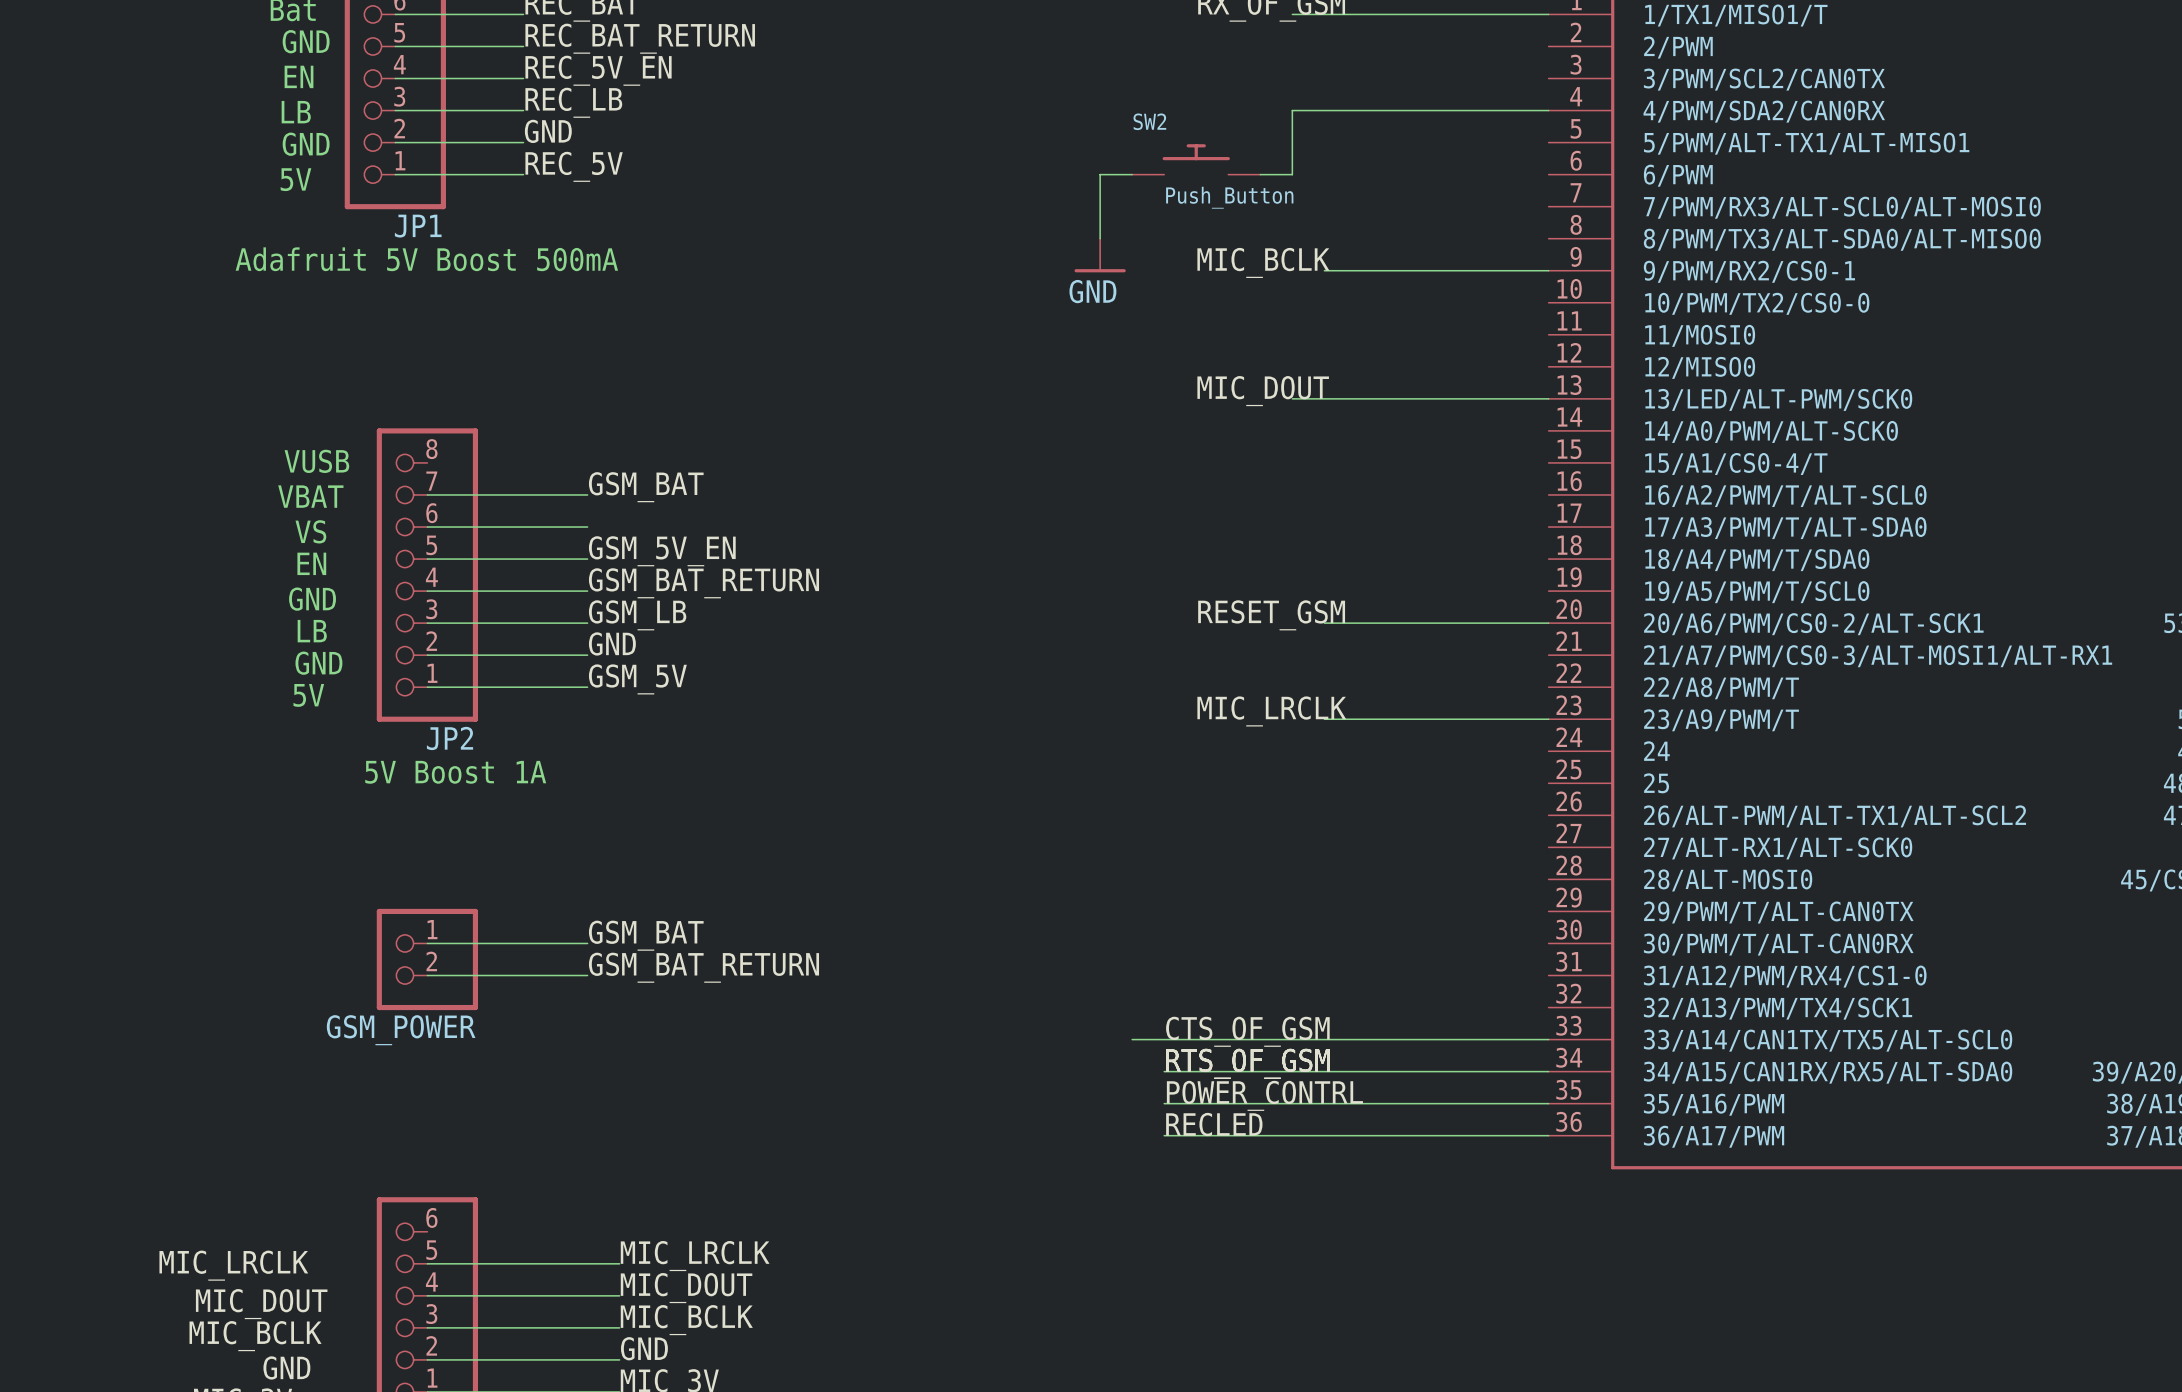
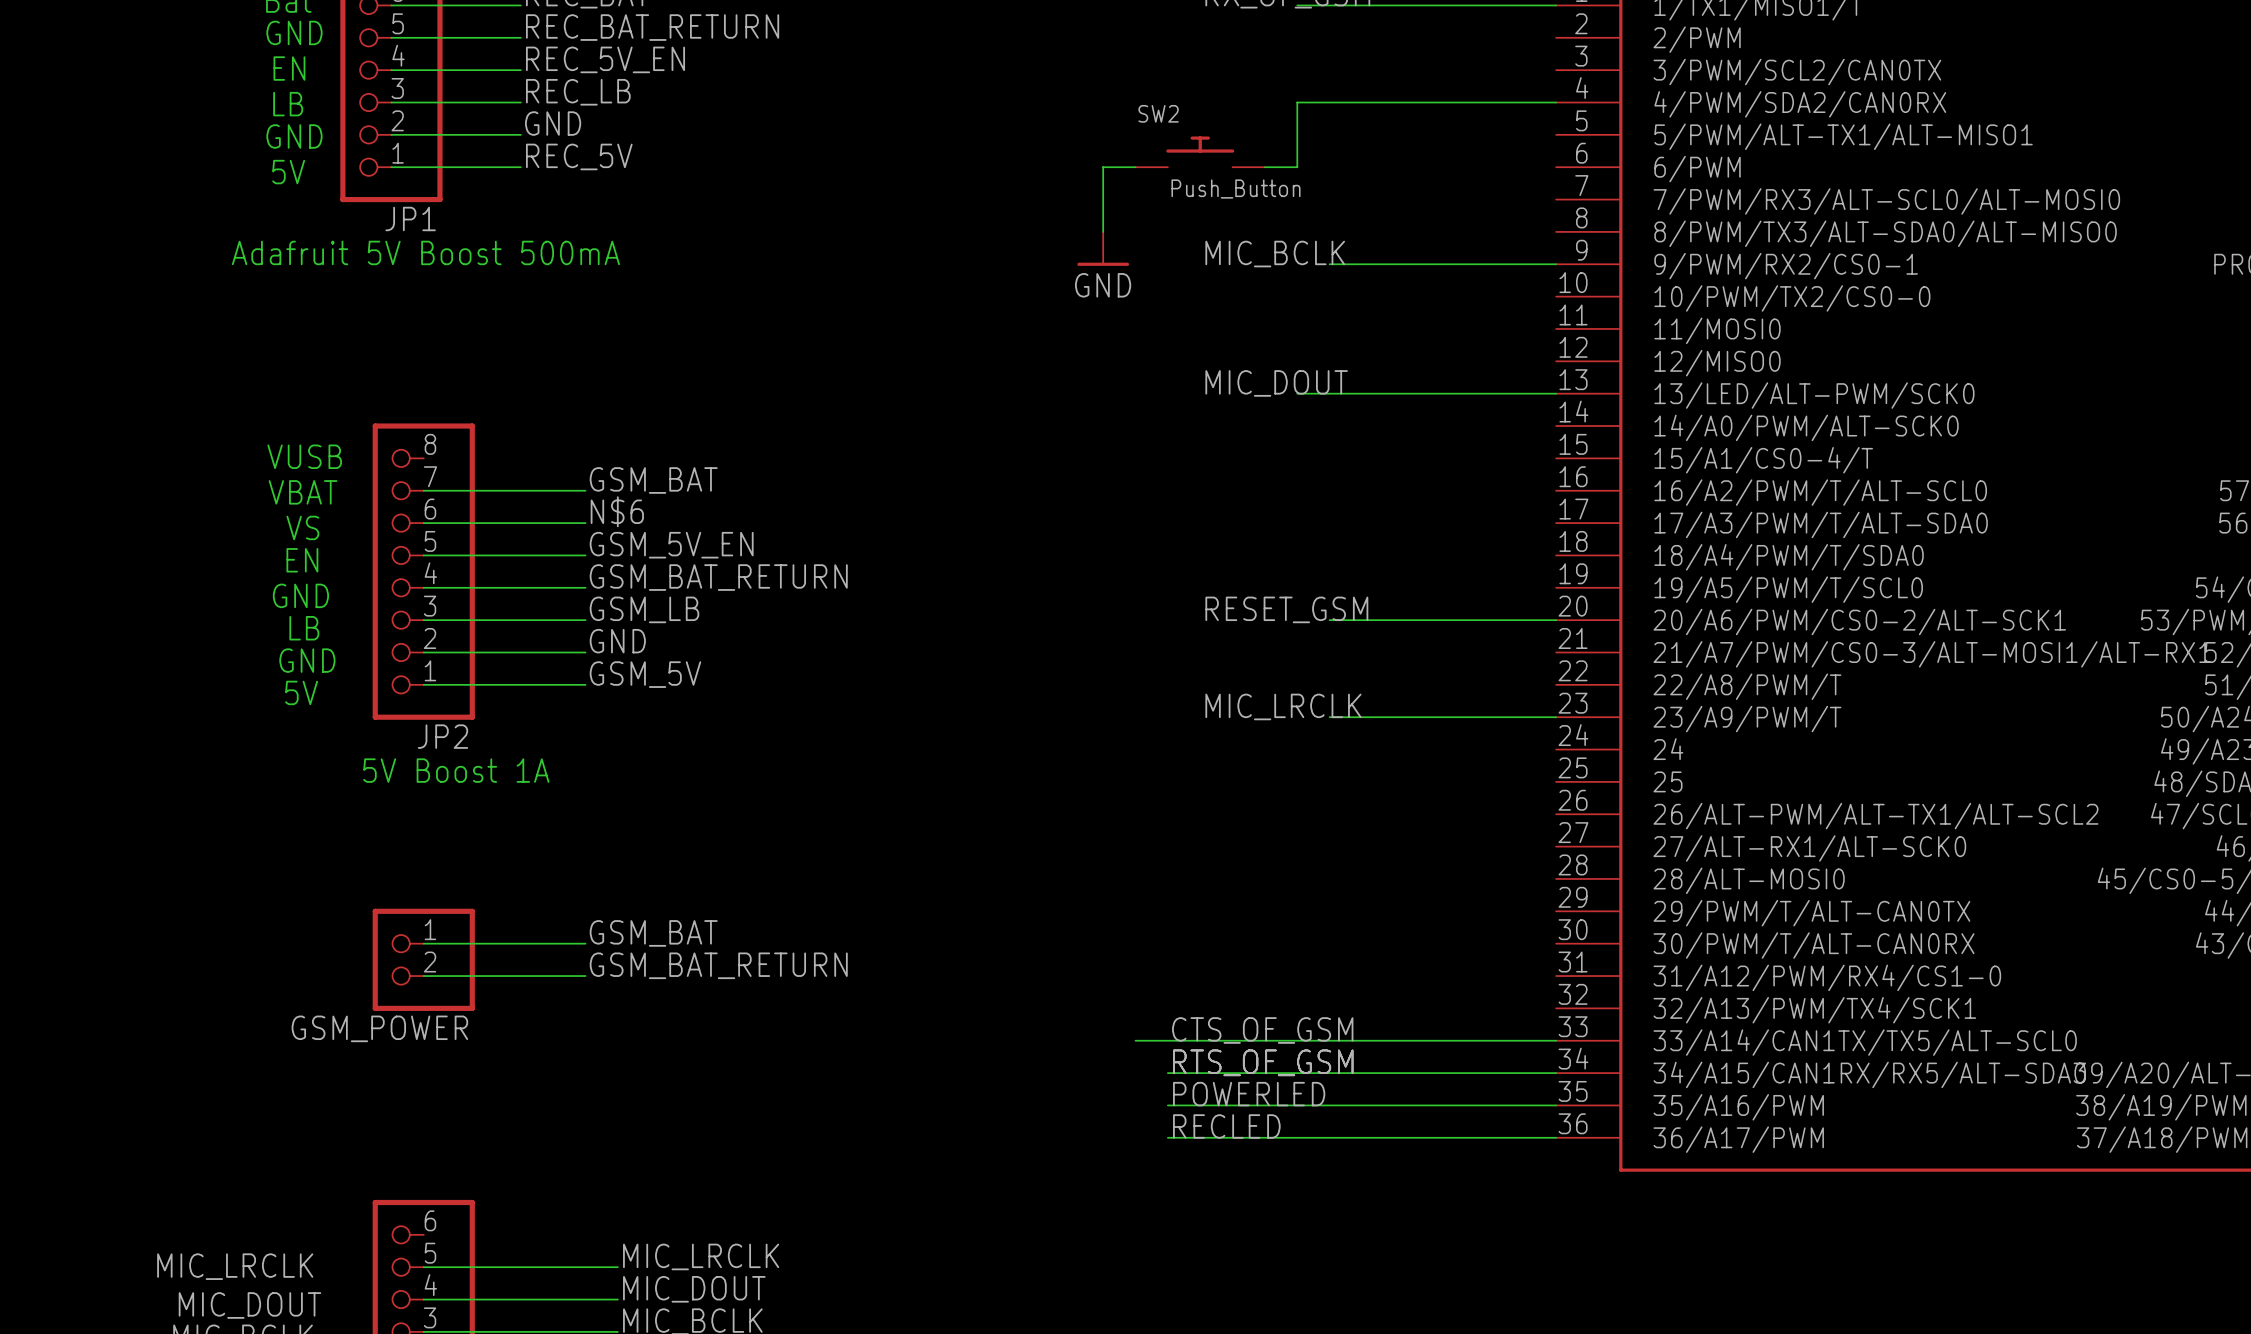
label: none -> N$6 (617, 511)
label: POWER_CONTRL (1264, 1095) -> POWERLED (1249, 1094)

